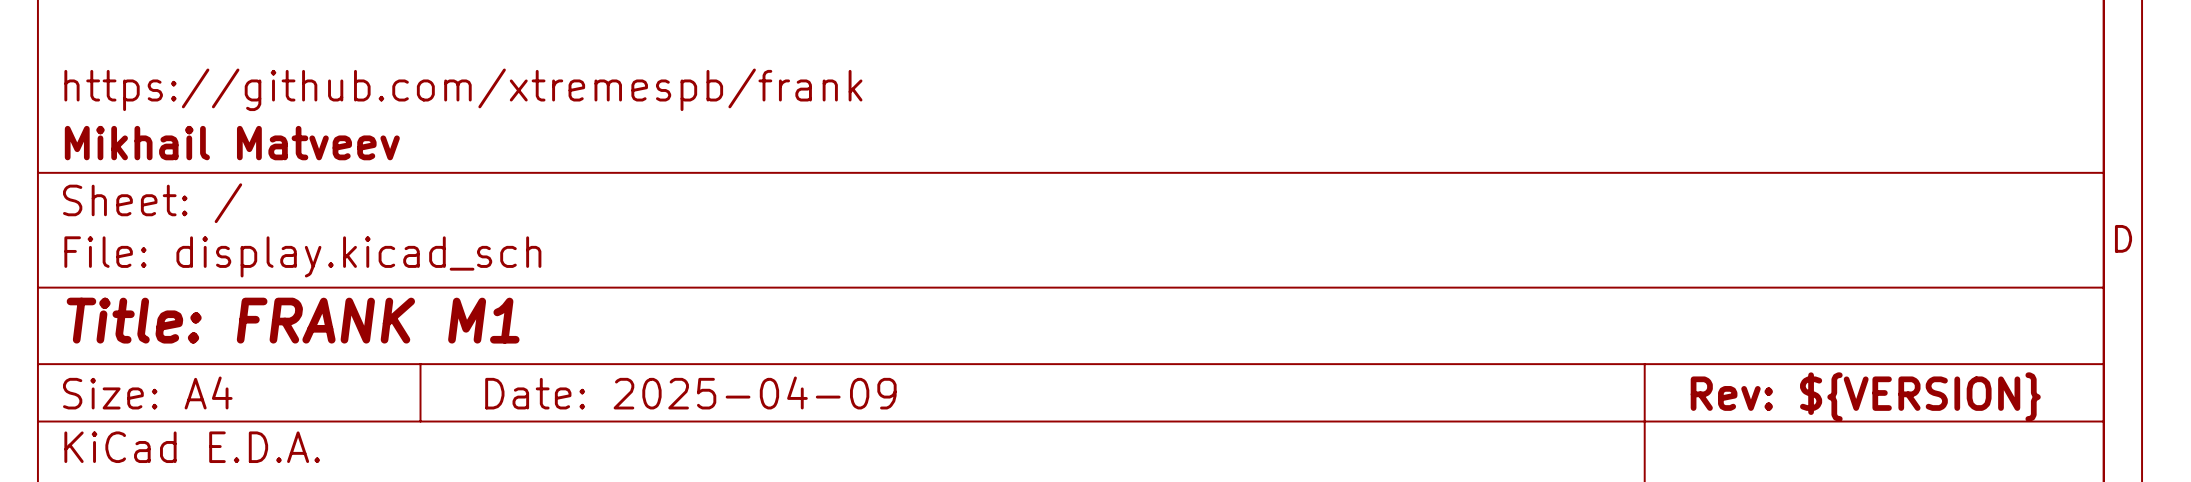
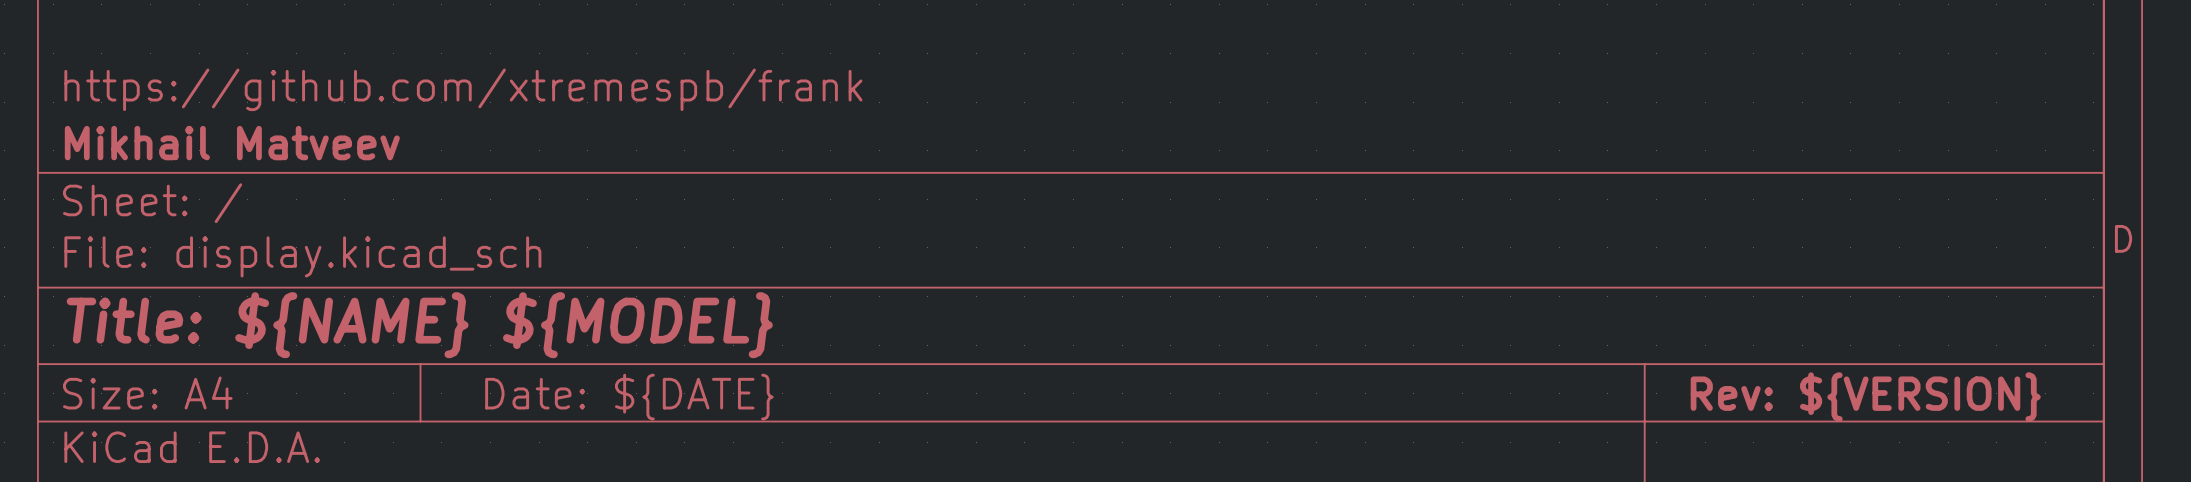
title block: Title: FRANK M1 (293, 320) -> Title: ${NAME} ${MODEL} (419, 325)
title block: Date: 2025-04-09 (690, 392) -> Date: ${DATE} (629, 397)

